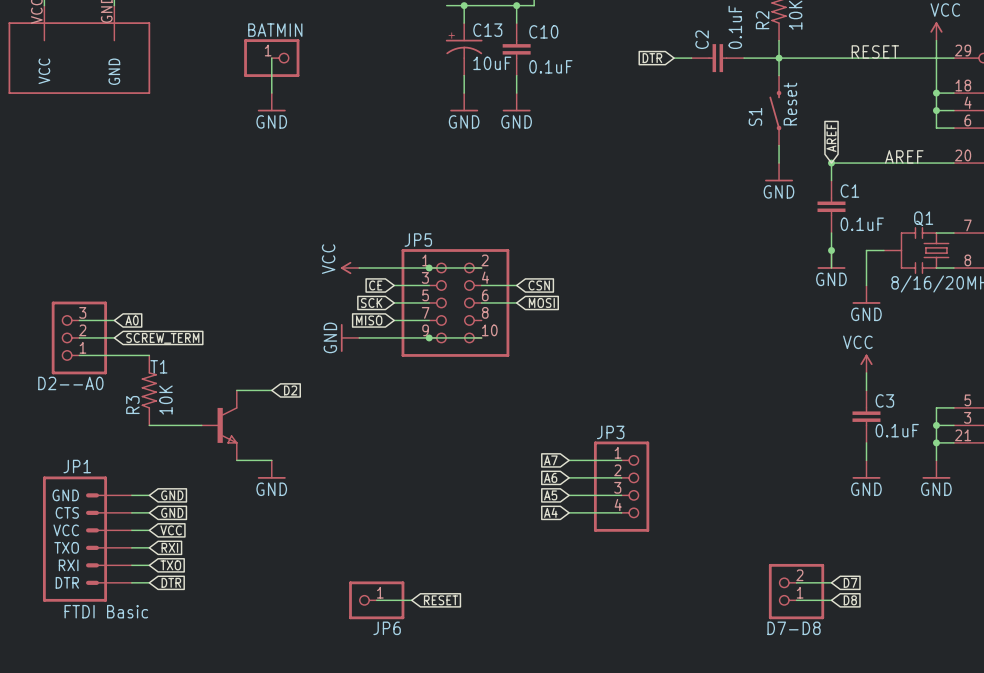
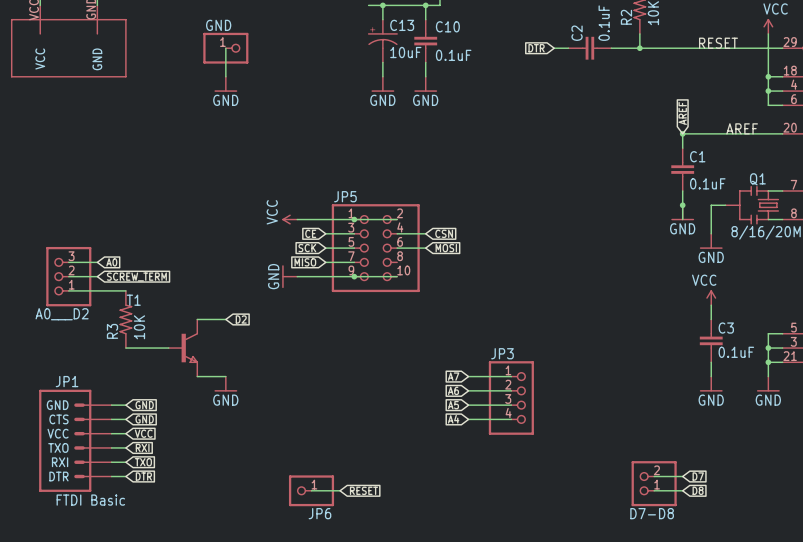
BATMIN name: BATMIN (275, 30) -> GND (218, 25)
wire: (779, 58) (779, 75) -> none
S1: Reset (775, 110) -> none
wire: (779, 145) (779, 163) -> none
power symbol: GND (779, 172) -> none
D2--A0 name: D2--A0 (70, 383) -> A0___D2 (62, 314)

